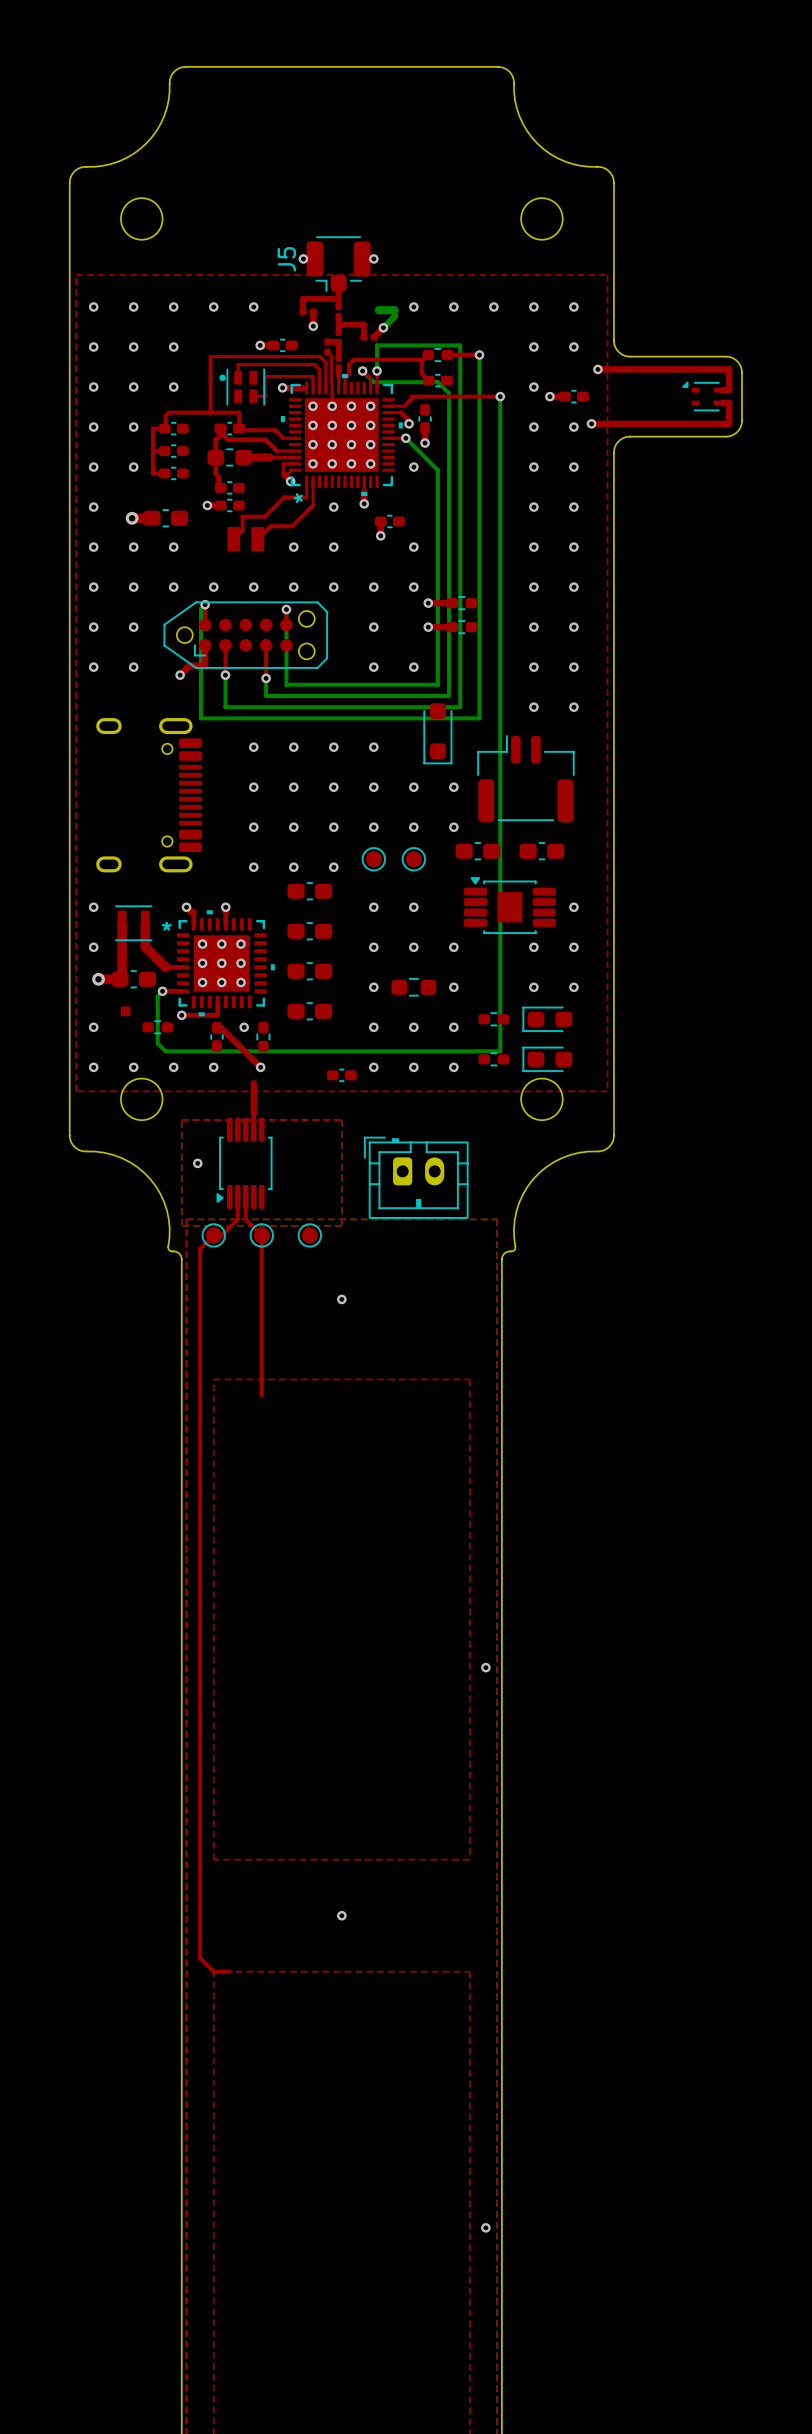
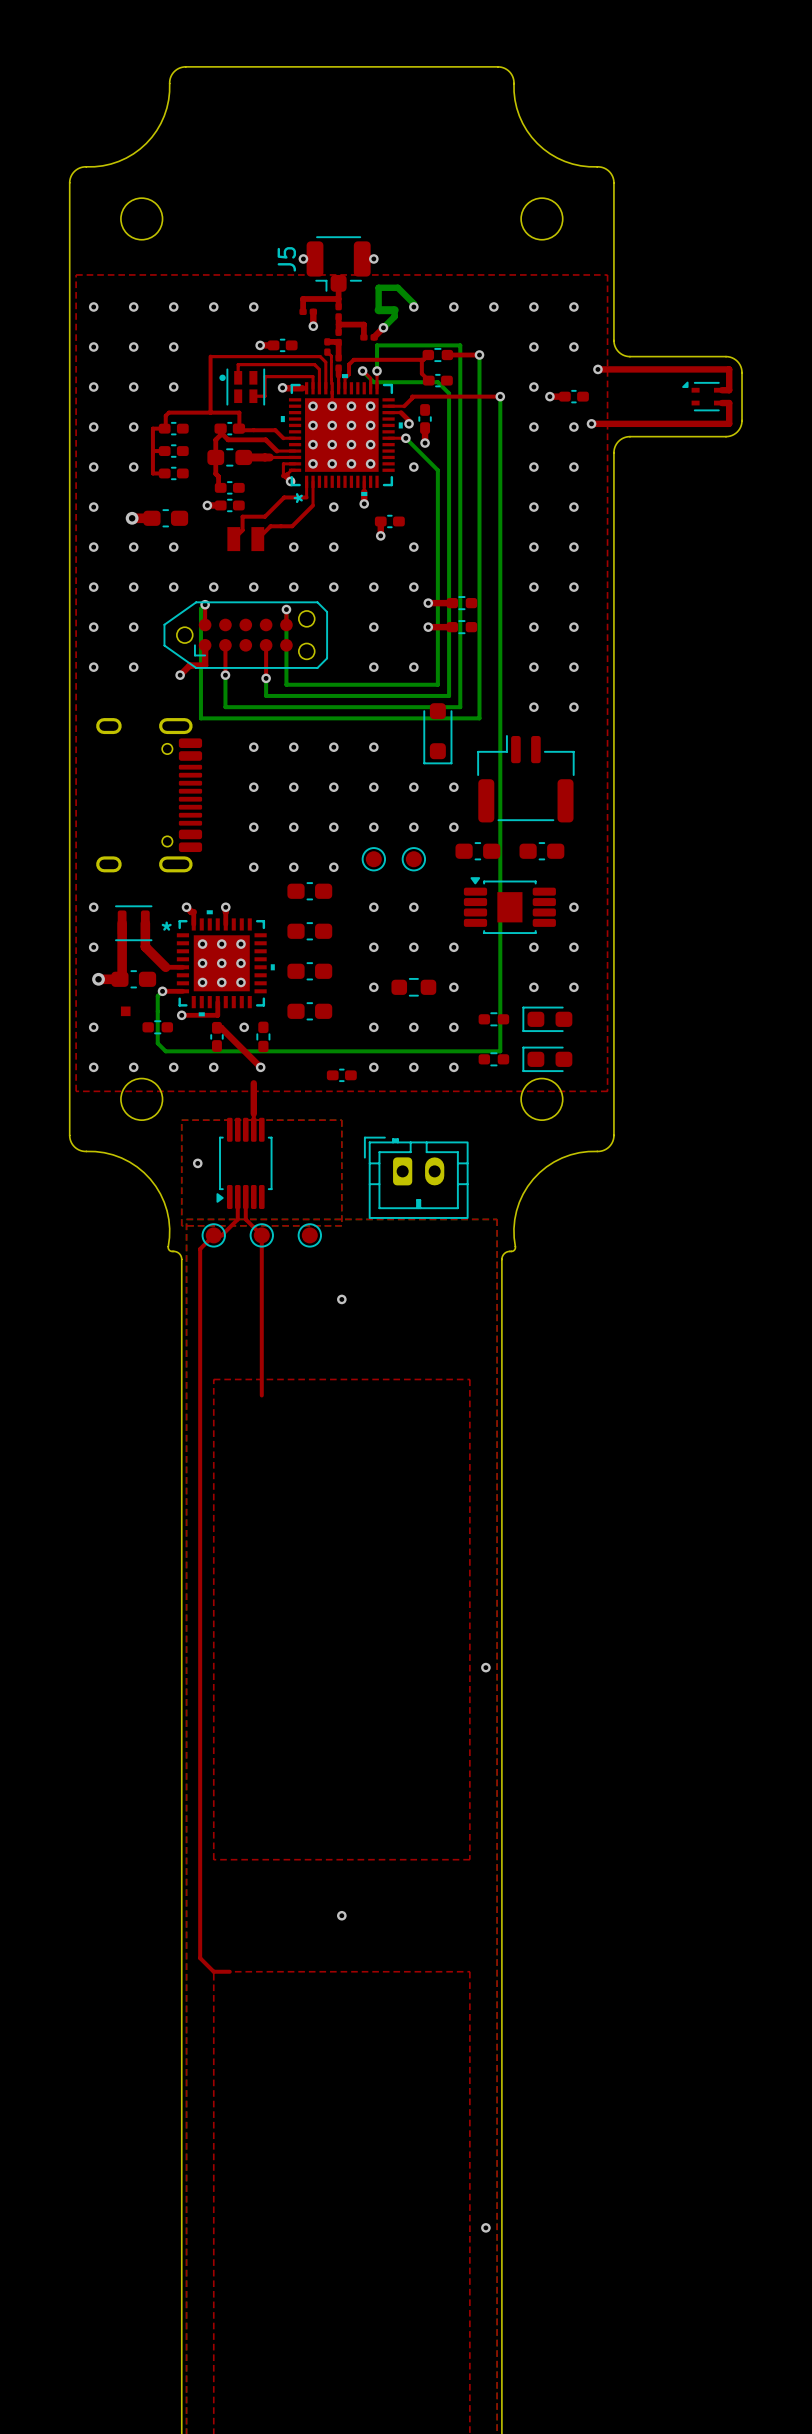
bottom track: none -> (413, 306) (413, 303) (397, 287) (378, 287) (378, 310)

